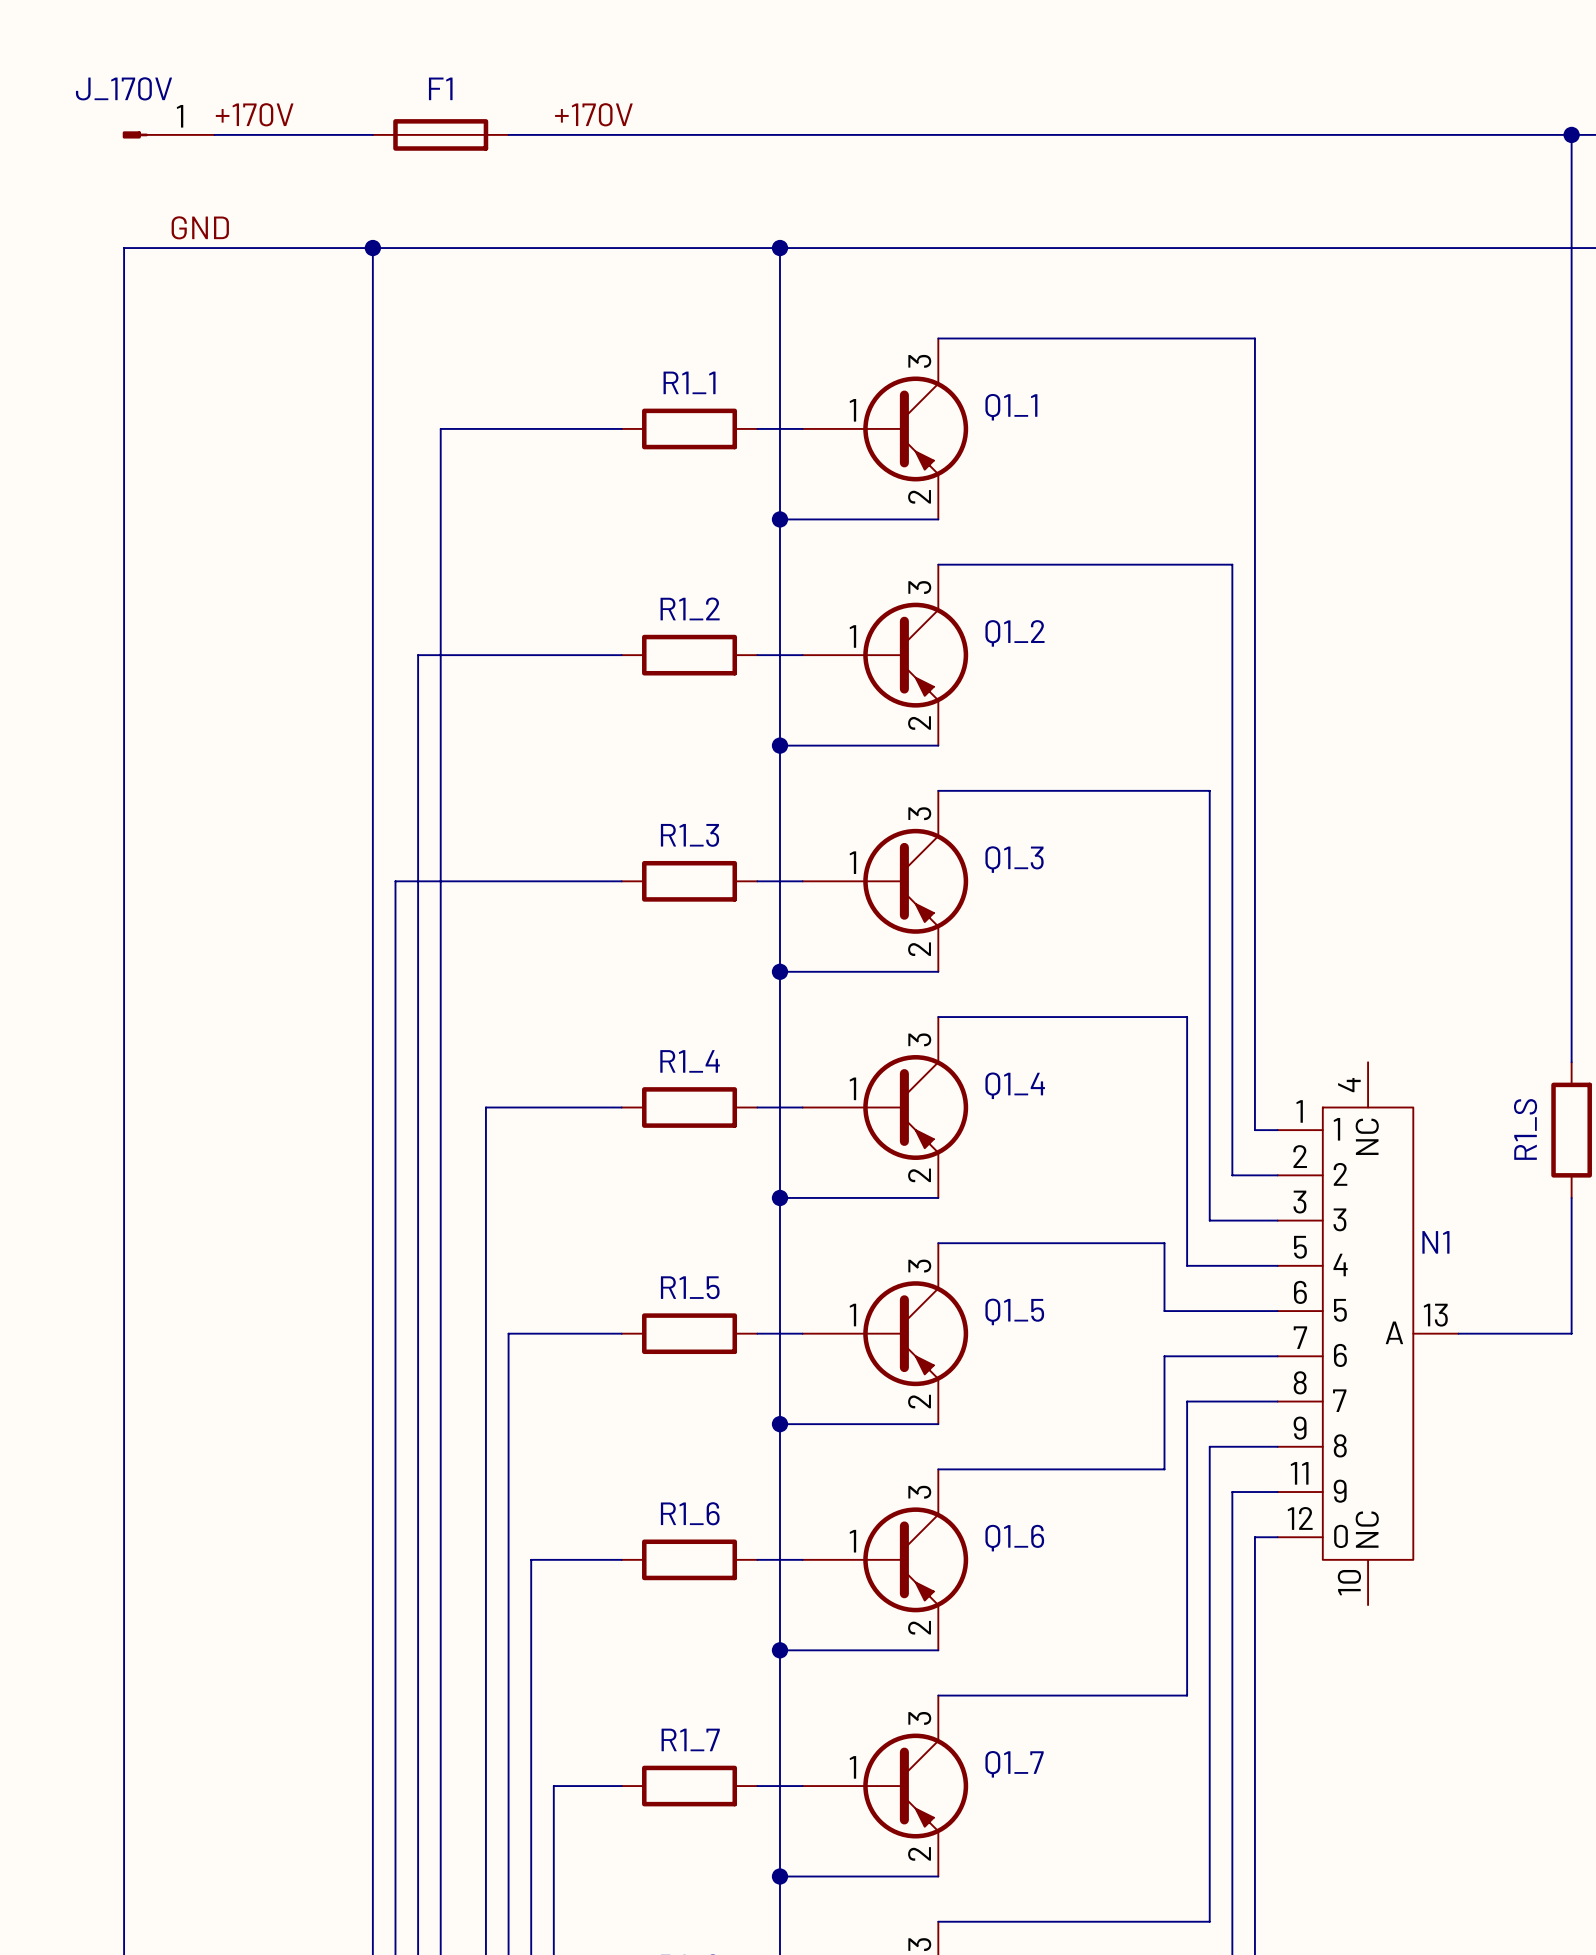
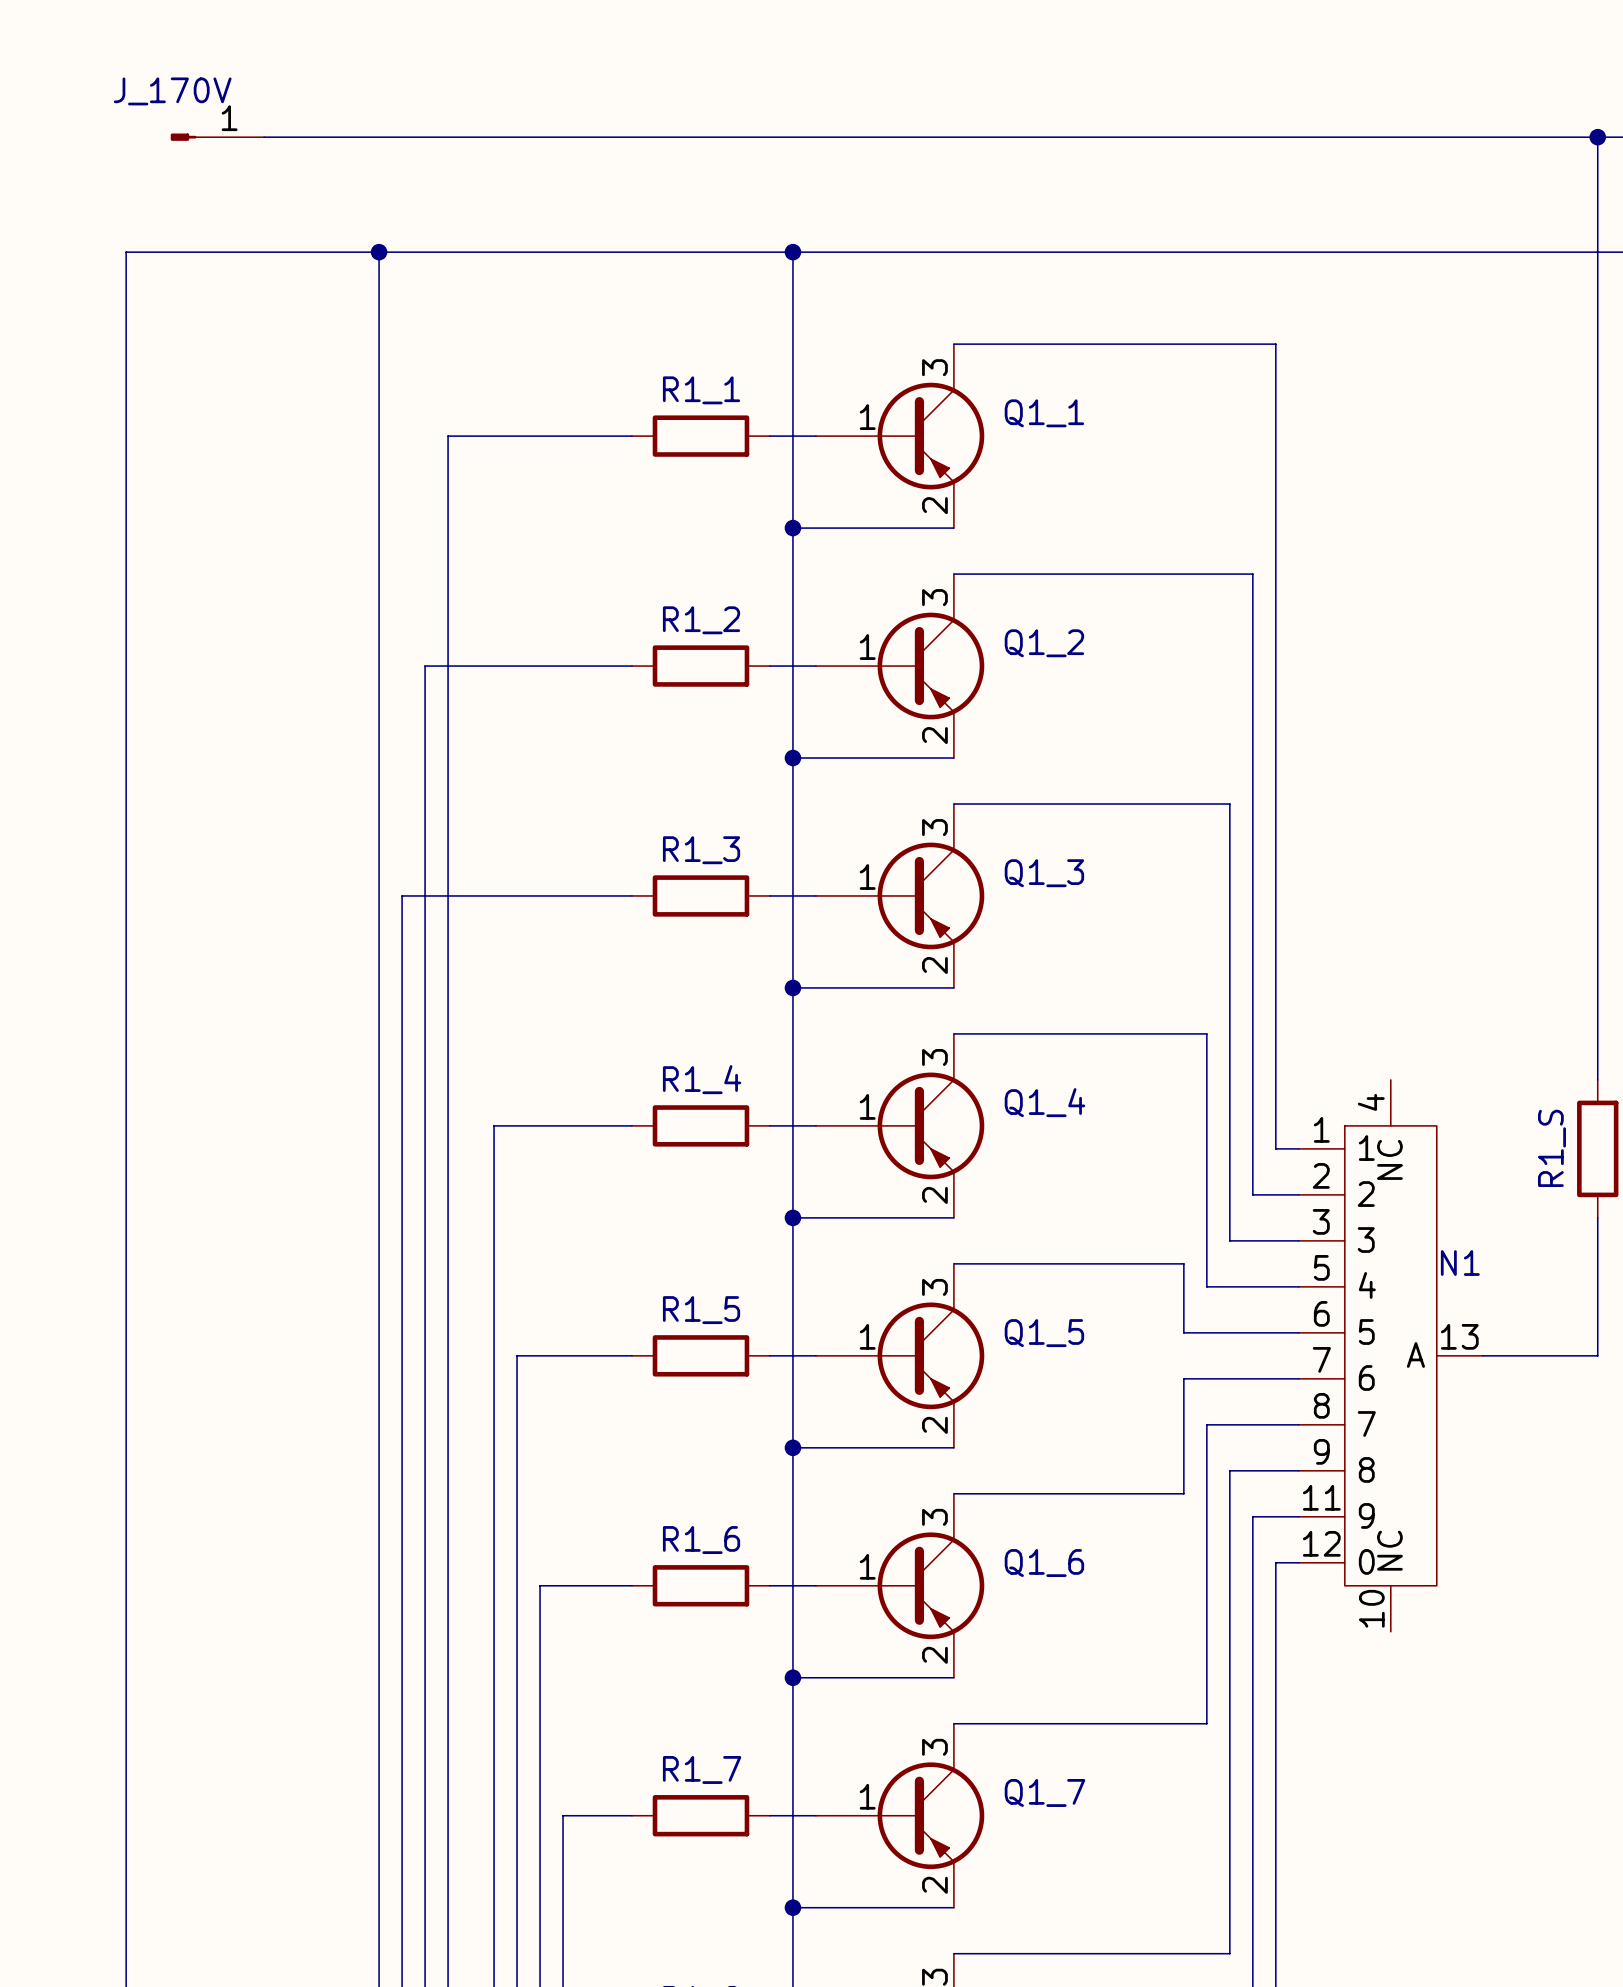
label: +170V (254, 114) -> none
label: +170V (593, 114) -> none
J_170V position: (168, 134) -> (217, 137)
F1: (440, 134) -> none
label: GND (200, 227) -> none

